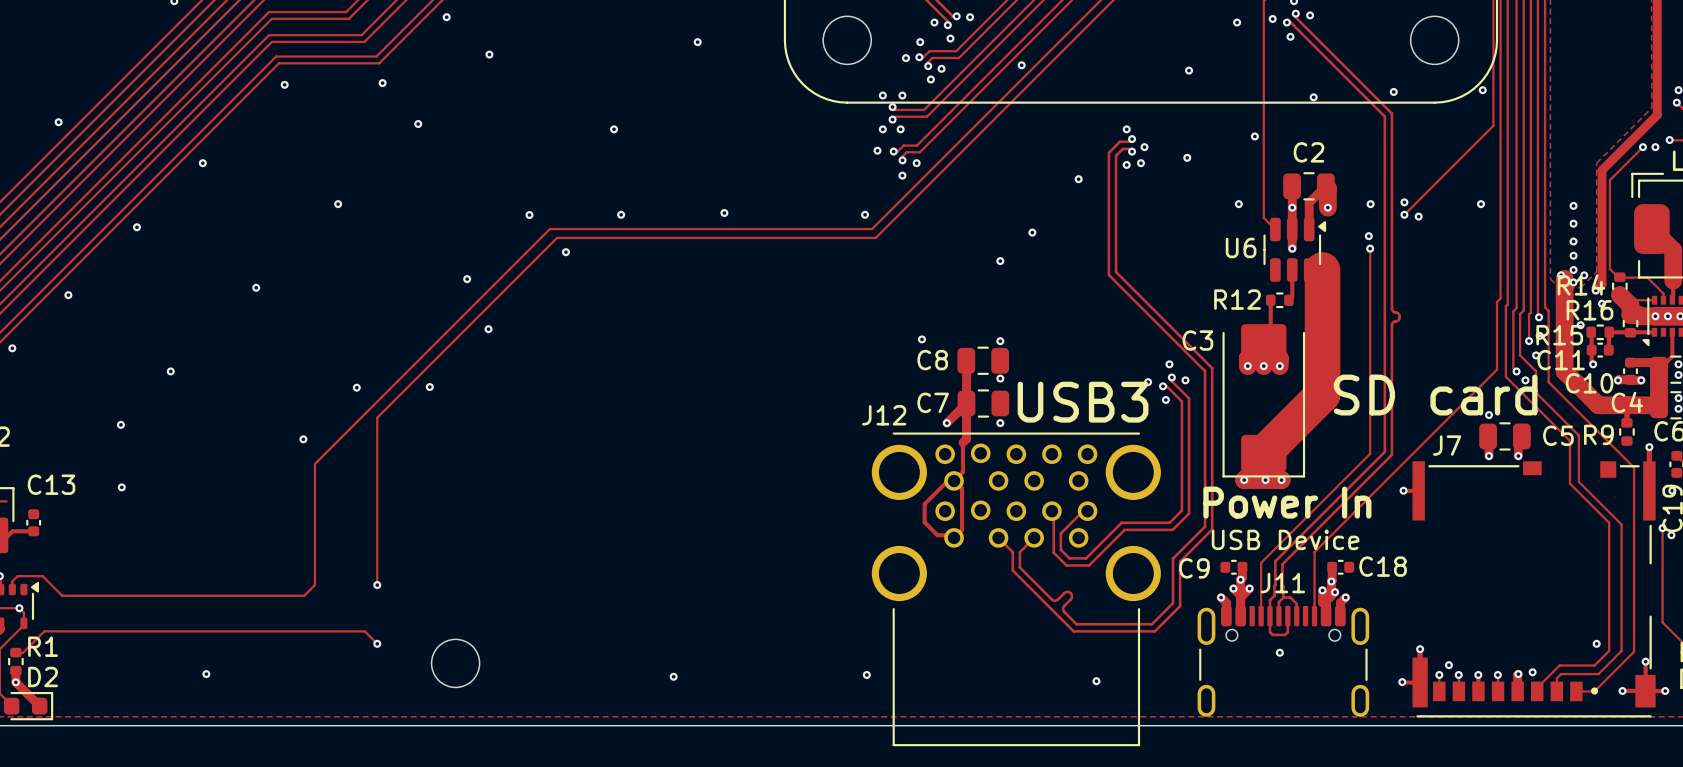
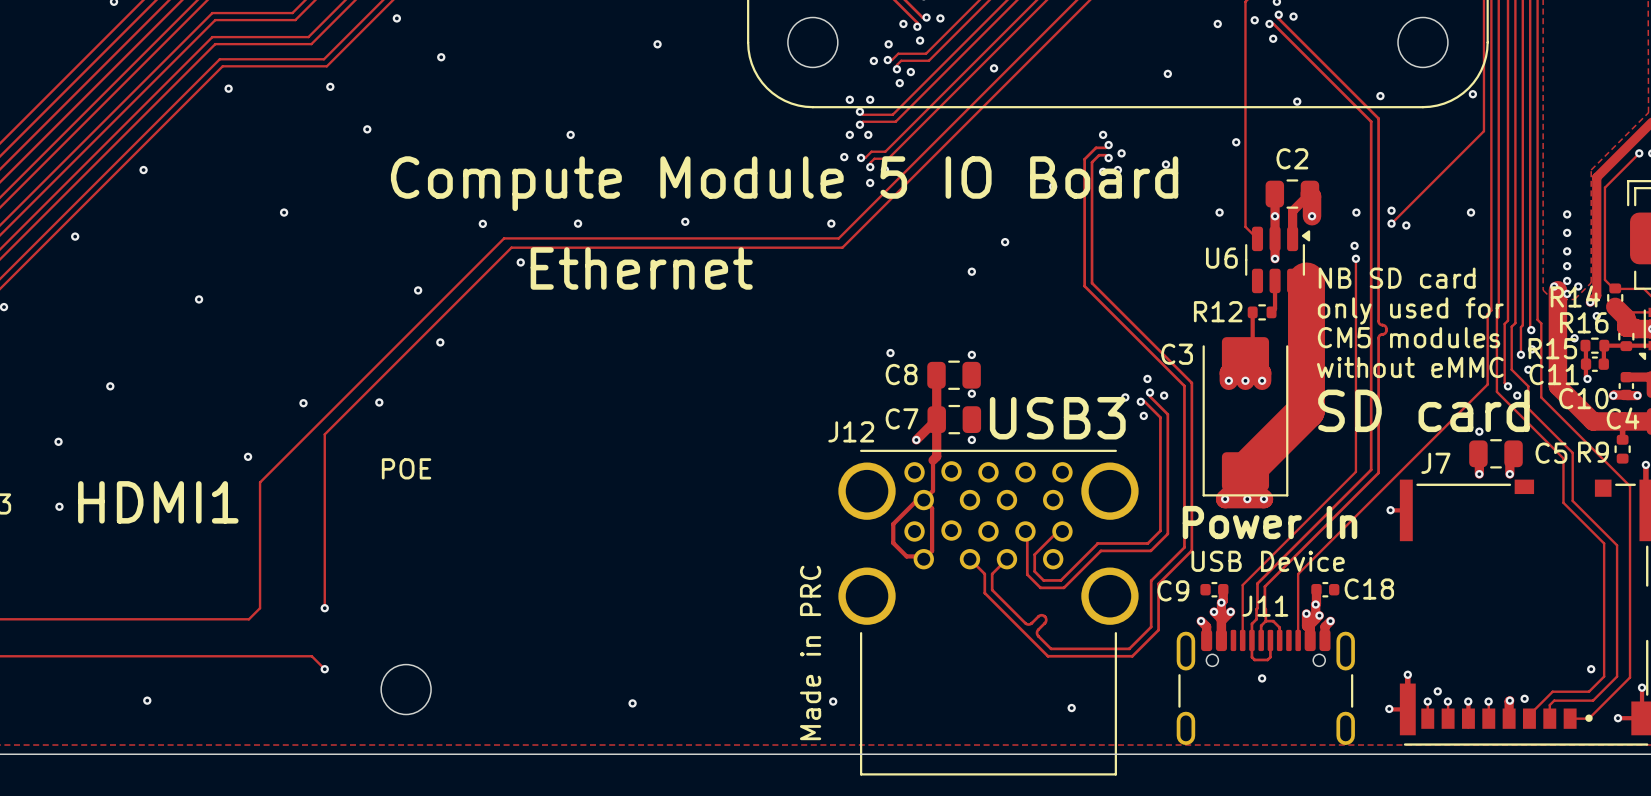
text: none -> Compute Module 5 IO Board (784, 183)
text: none -> Ethernet (641, 268)
text: none -> NB SD card (1397, 278)
text: none -> only used for (1410, 310)
text: none -> CM5 modules (1409, 337)
text: none -> without eMMC (1410, 367)
text: none -> POE (406, 468)
text: none -> HDMI1 (158, 502)
text: none -> Made in PRC (810, 652)

